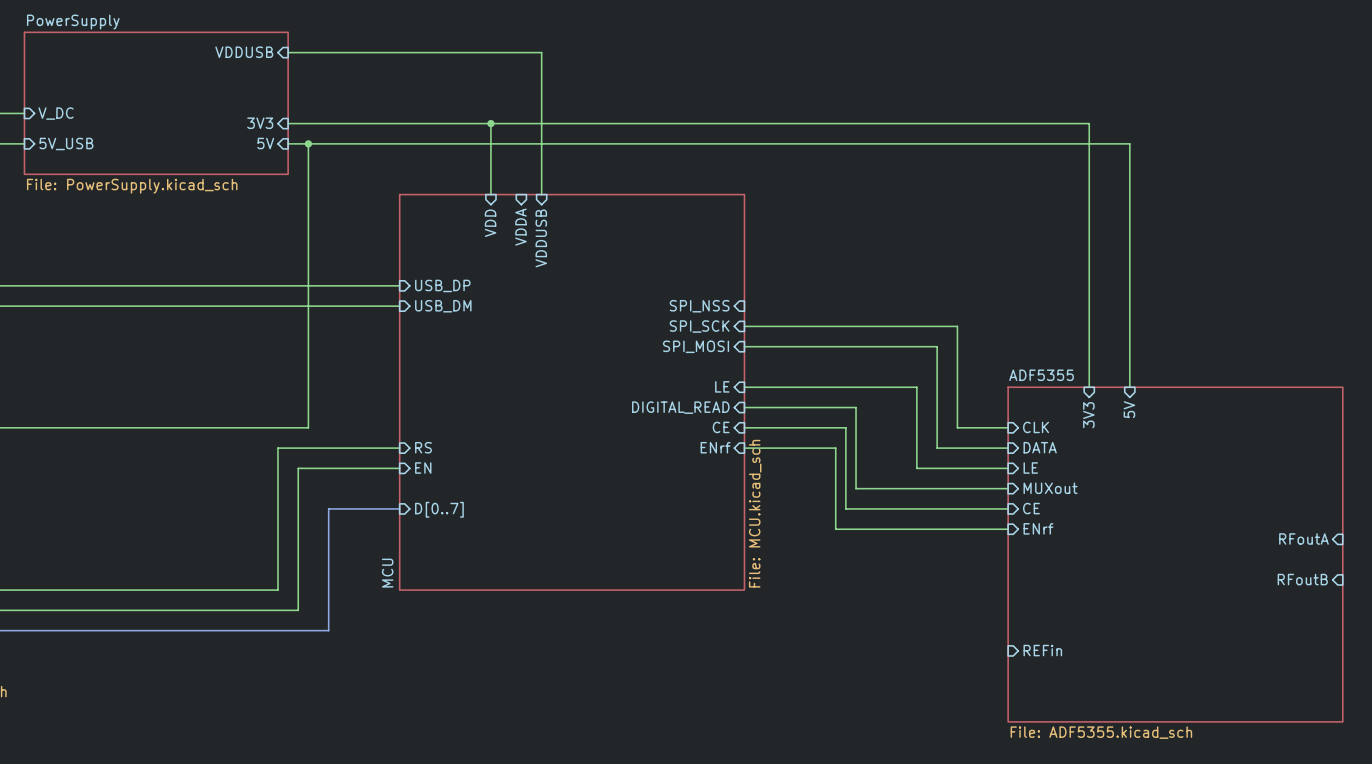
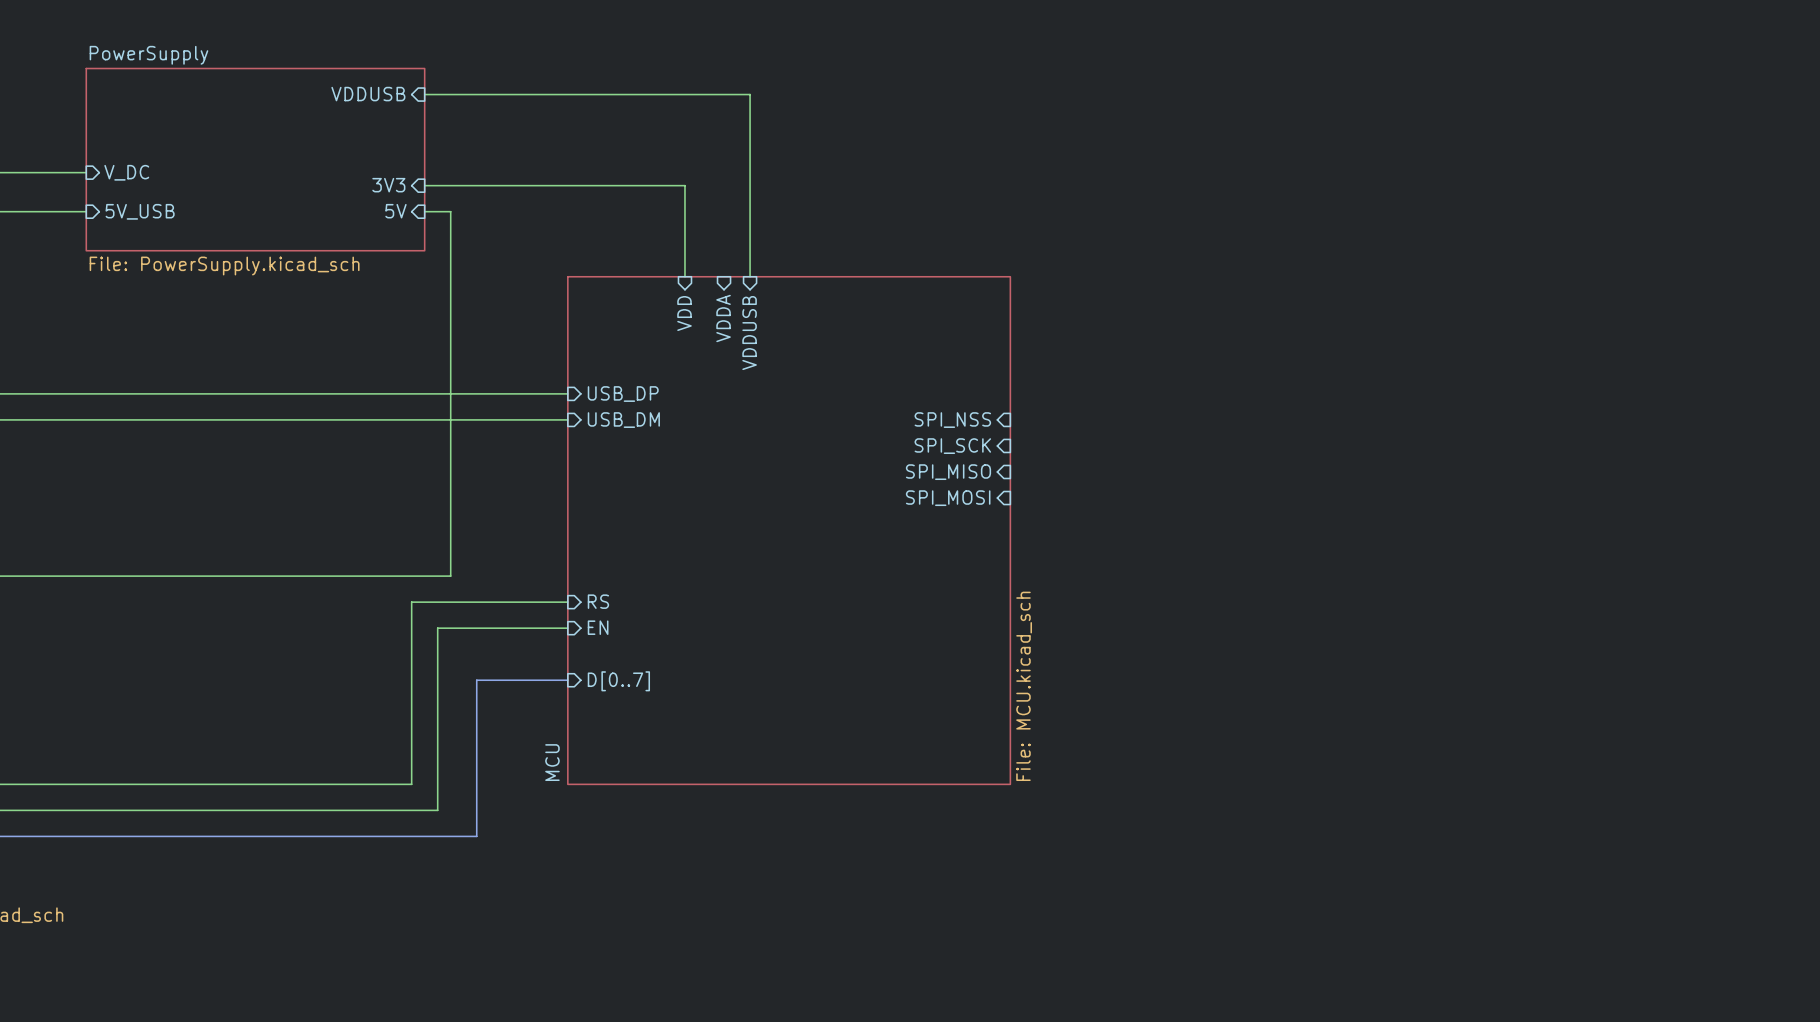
wire: (490, 123) (1089, 123) (1089, 387) -> none
junction: (490, 123) -> none
wire: (308, 143) (1129, 143) (1129, 387) -> none
junction: (308, 143) -> none
wire: (744, 326) (957, 326) (957, 427) (1008, 427) -> none
sheet pin: SPI_MOSI (696, 346) -> SPI_MISO (948, 472)
wire: (744, 346) (937, 346) (937, 448) (1008, 448) -> none
sheet pin: none -> SPI_MOSI (948, 498)
sheet pin: LE (722, 386) -> none
wire: (744, 387) (916, 387) (916, 468) (1008, 468) -> none
sheet pin: DIGITAL_READ (680, 407) -> none
wire: (744, 407) (856, 407) (856, 488) (1008, 488) -> none
sheet pin: 5V (1129, 409) -> none
sheet pin: 3V3 (1088, 415) -> none
sheet pin: CE (721, 427) -> none
wire: (744, 427) (845, 427) (845, 508) (1008, 508) -> none
sheet pin: CLK (1036, 427) -> none
sheet pin: ENrf (715, 447) -> none
sheet pin: DATA (1040, 447) -> none
wire: (744, 448) (835, 448) (835, 529) (1008, 529) -> none
sheet pin: LE (1030, 468) -> none
sheet pin: MUXout (1050, 488) -> none
sheet pin: CE (1031, 508) -> none
sheet pin: ENrf (1038, 528) -> none
sheet pin: RFoutA (1303, 538) -> none
sheet ADF5355: File: ADF5355.kicad_sch (1175, 554) -> none
sheet pin: RFoutB (1302, 579) -> none
sheet pin: REFin (1042, 650) -> none

